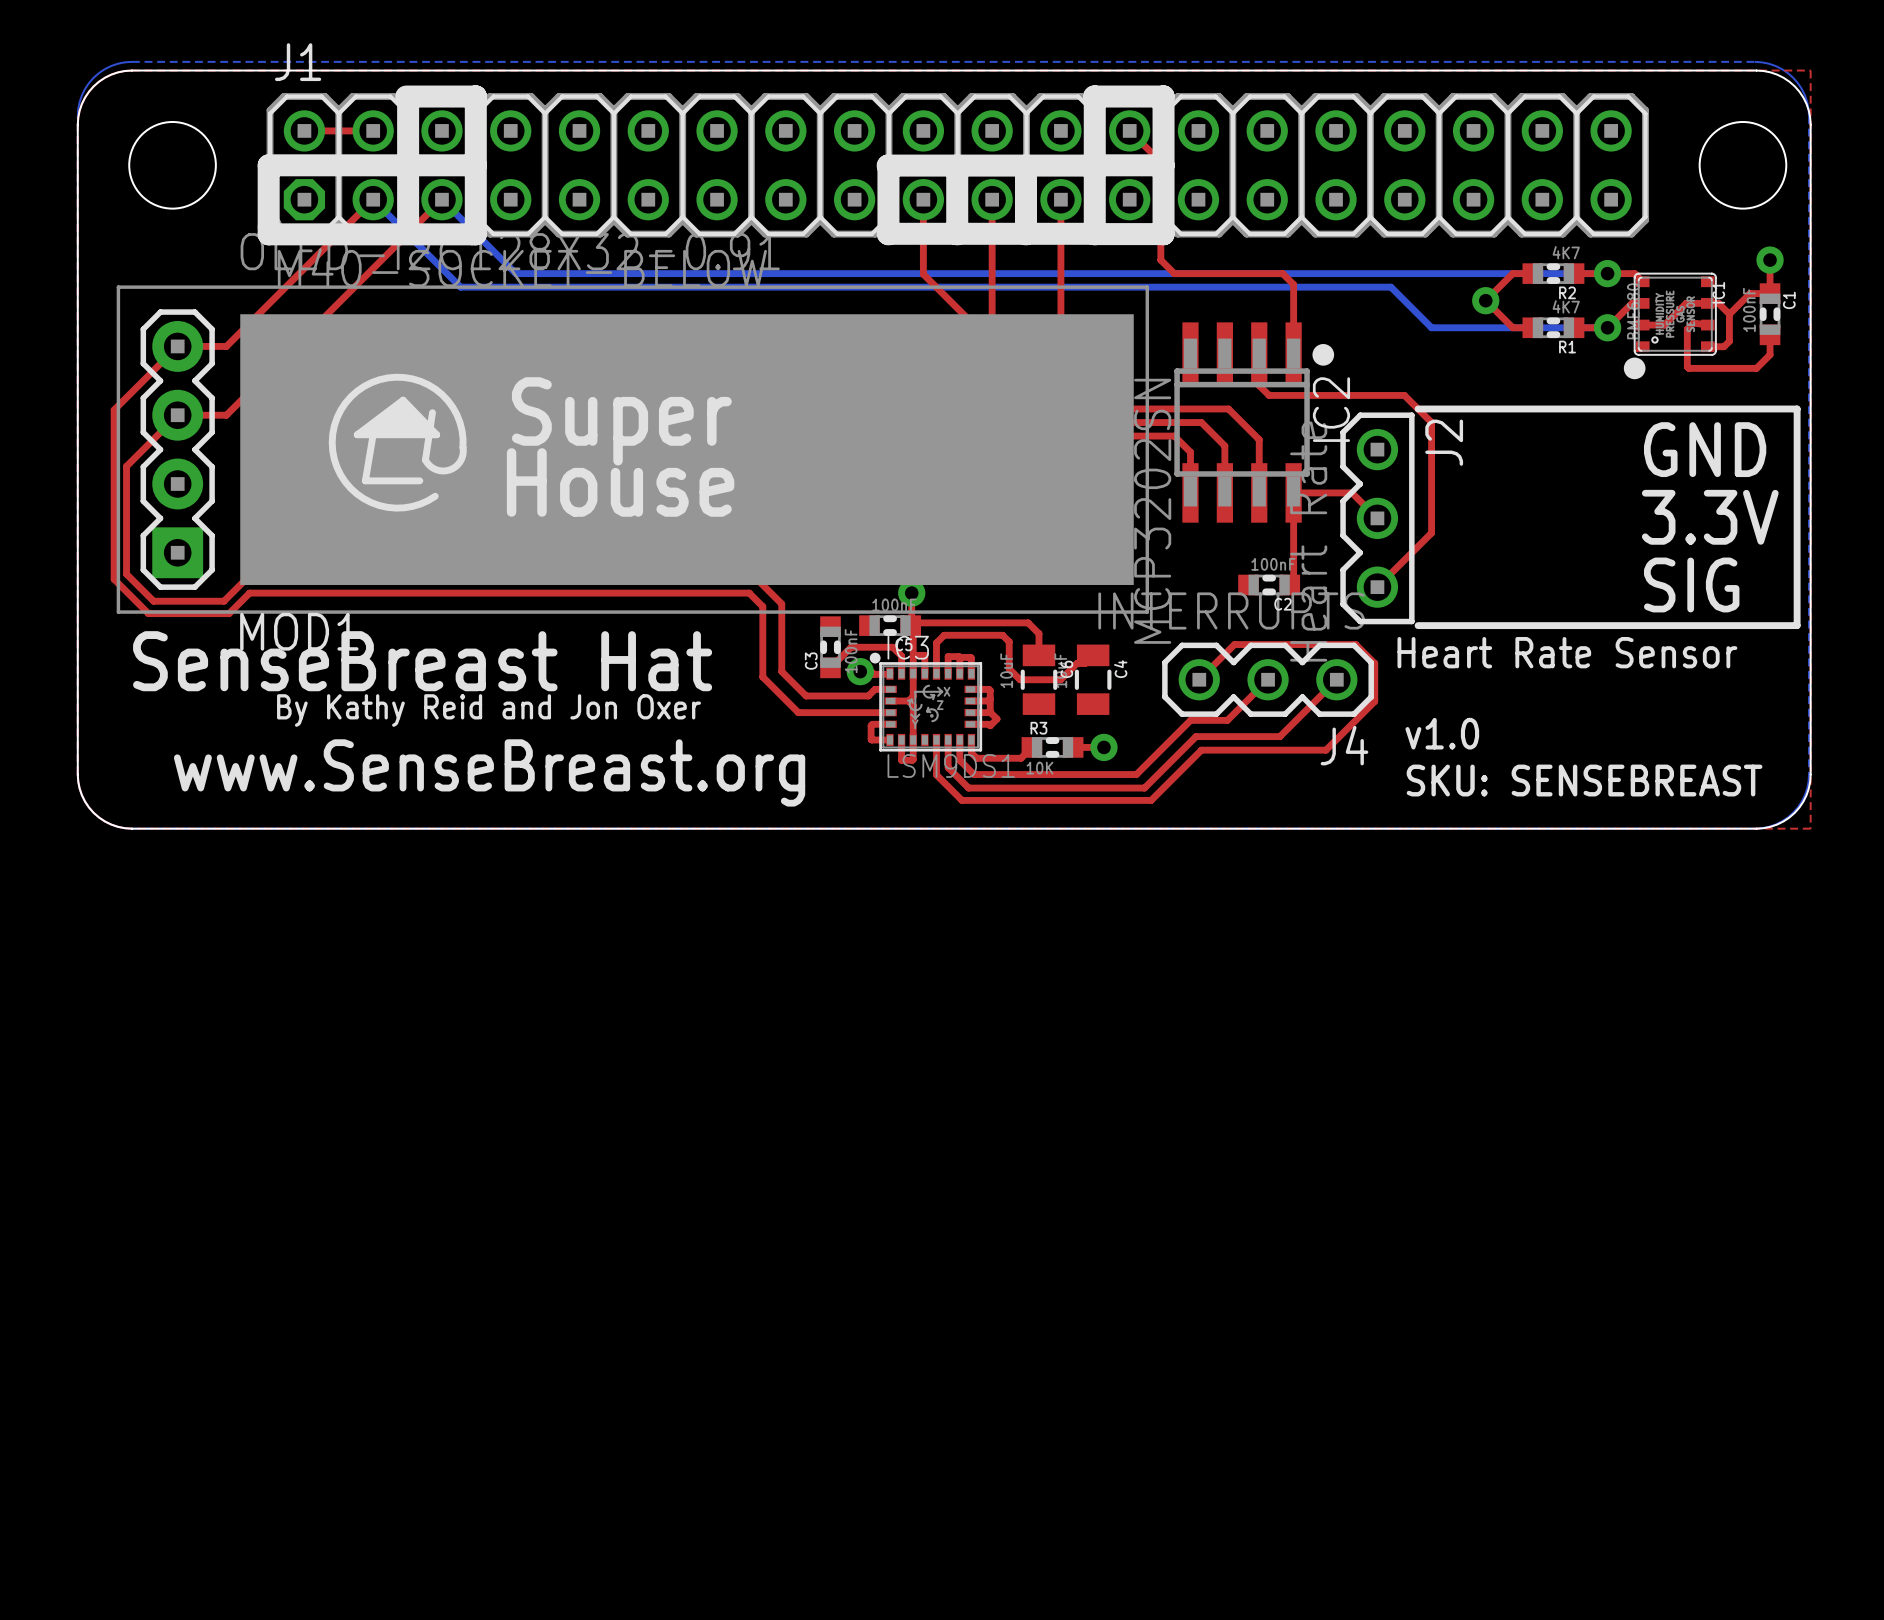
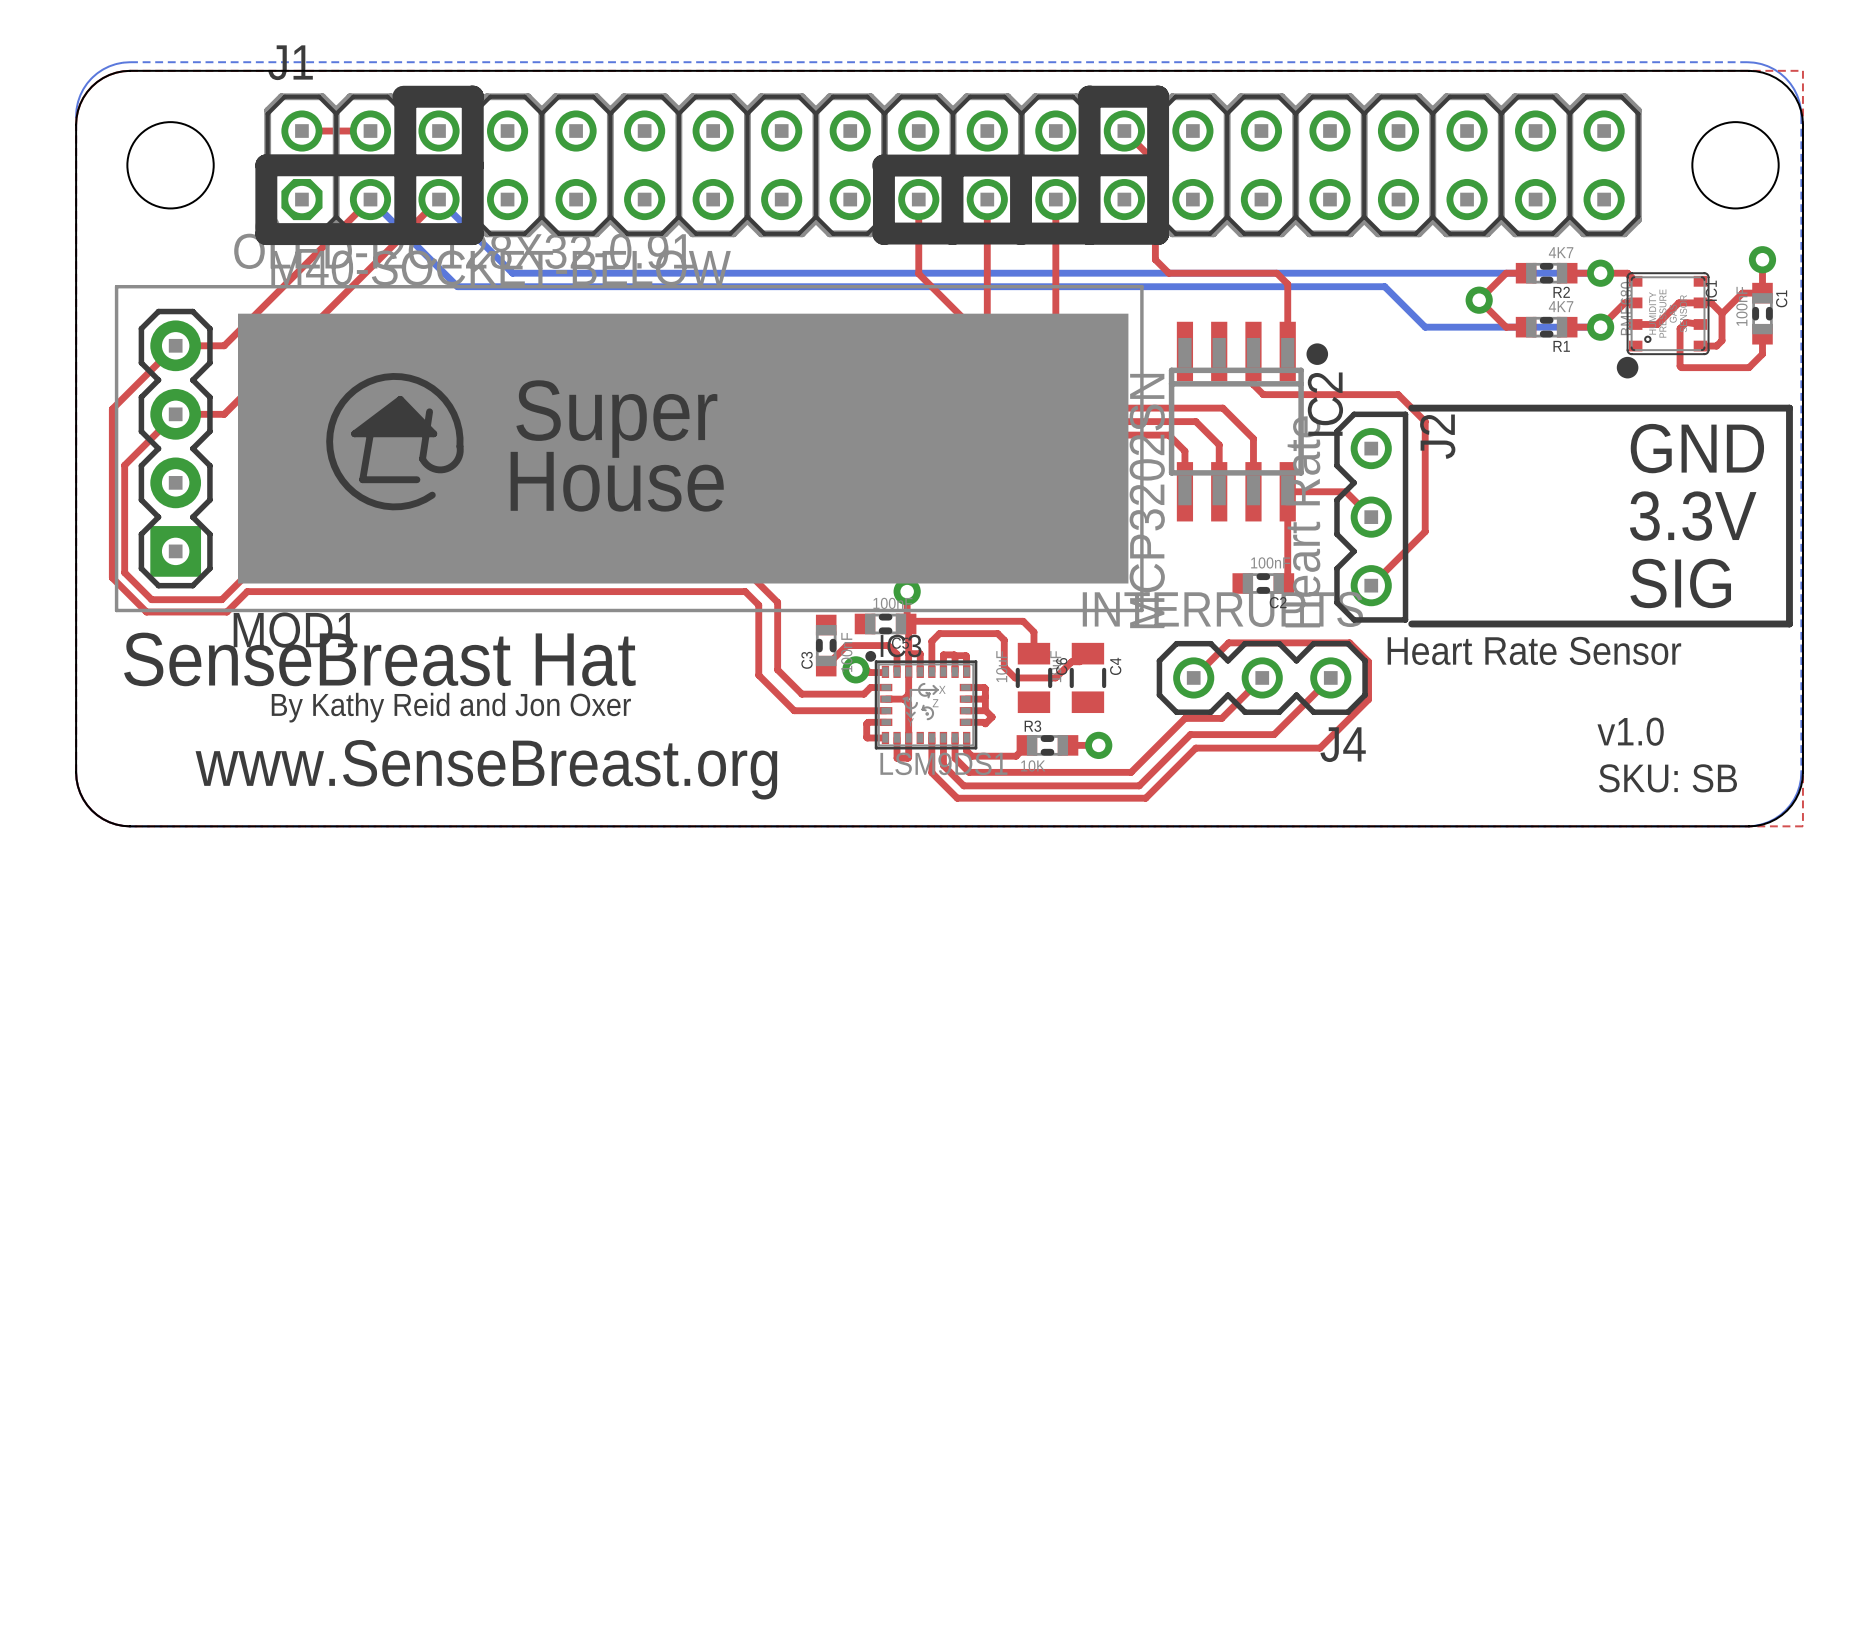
text position: v1.0 (1442, 733) -> v1.0 (1630, 731)
text: SKU: SENSEBREAST (1584, 780) -> SKU: SB (1667, 778)

